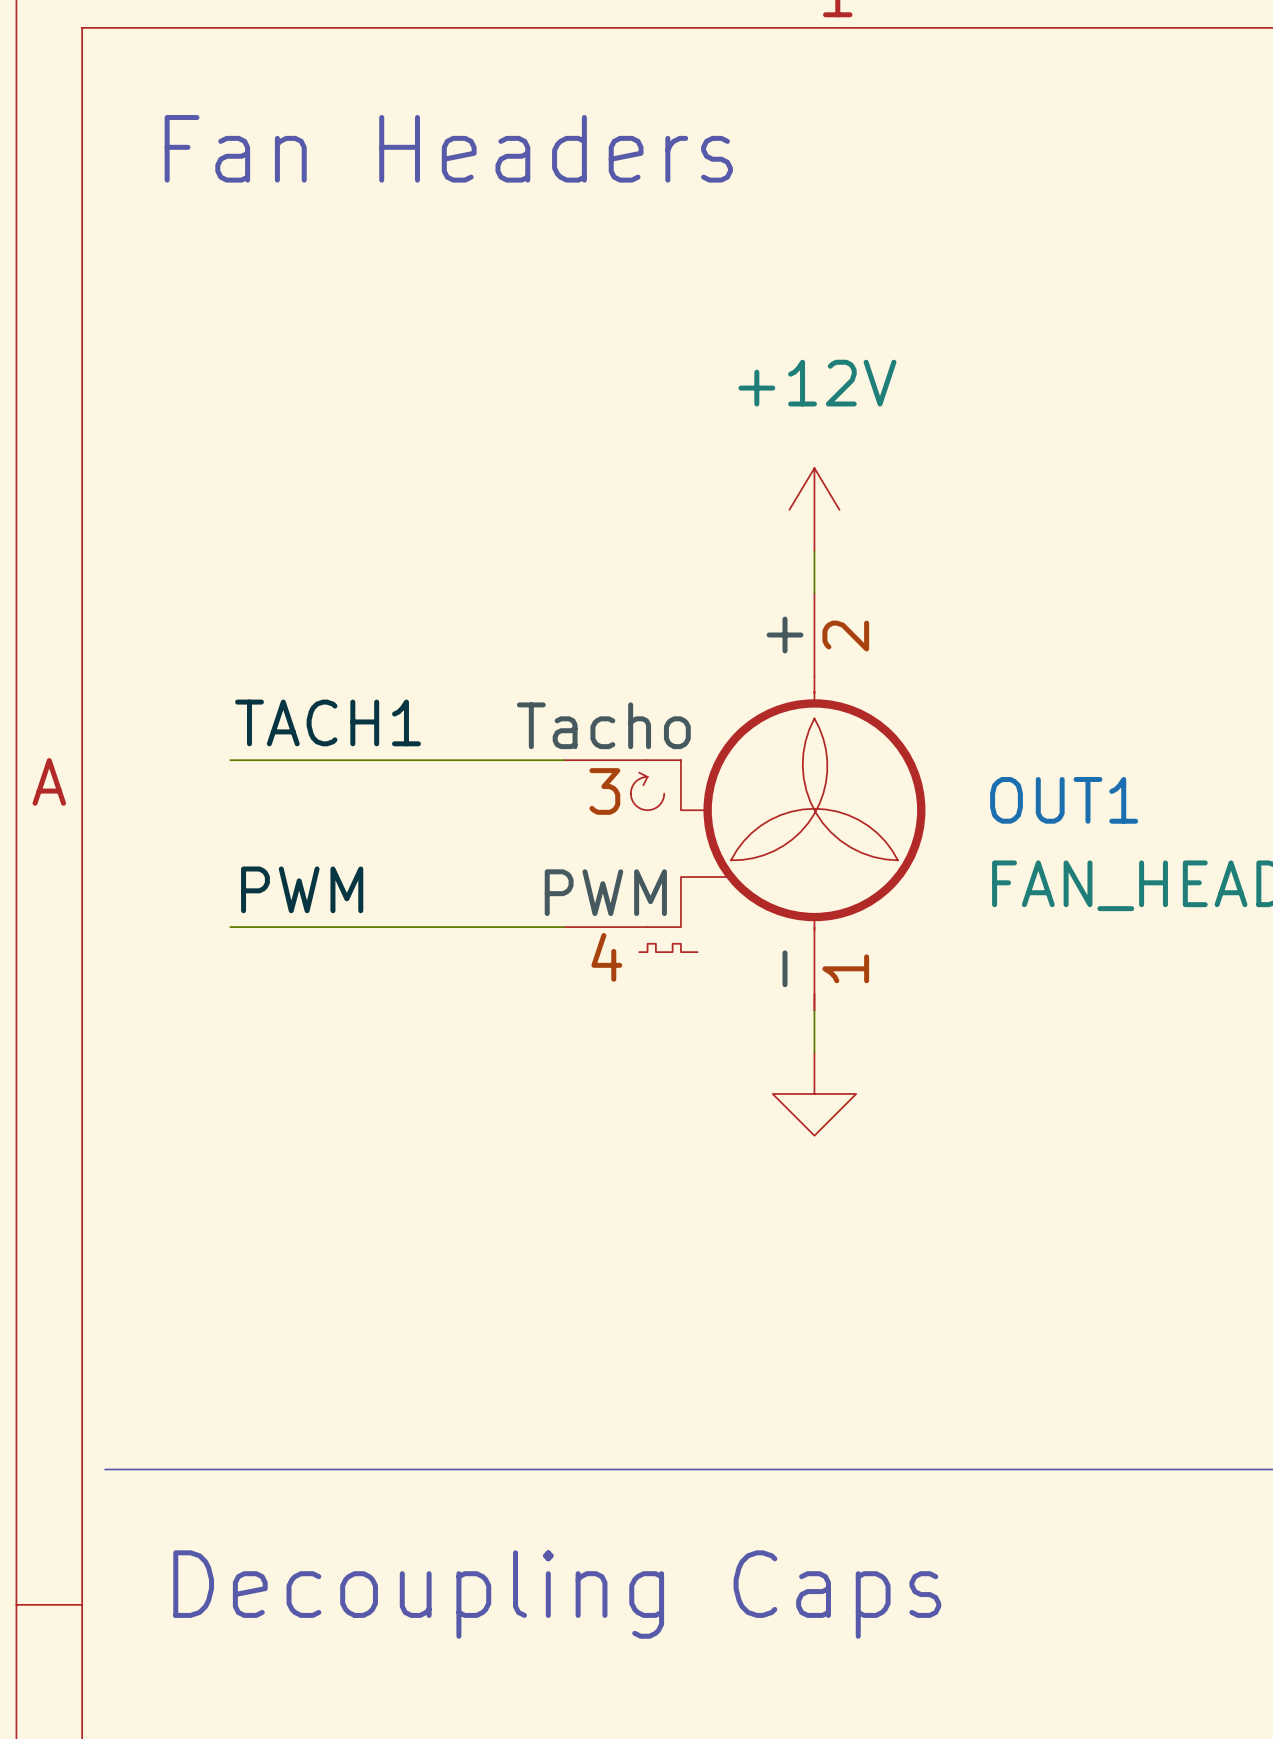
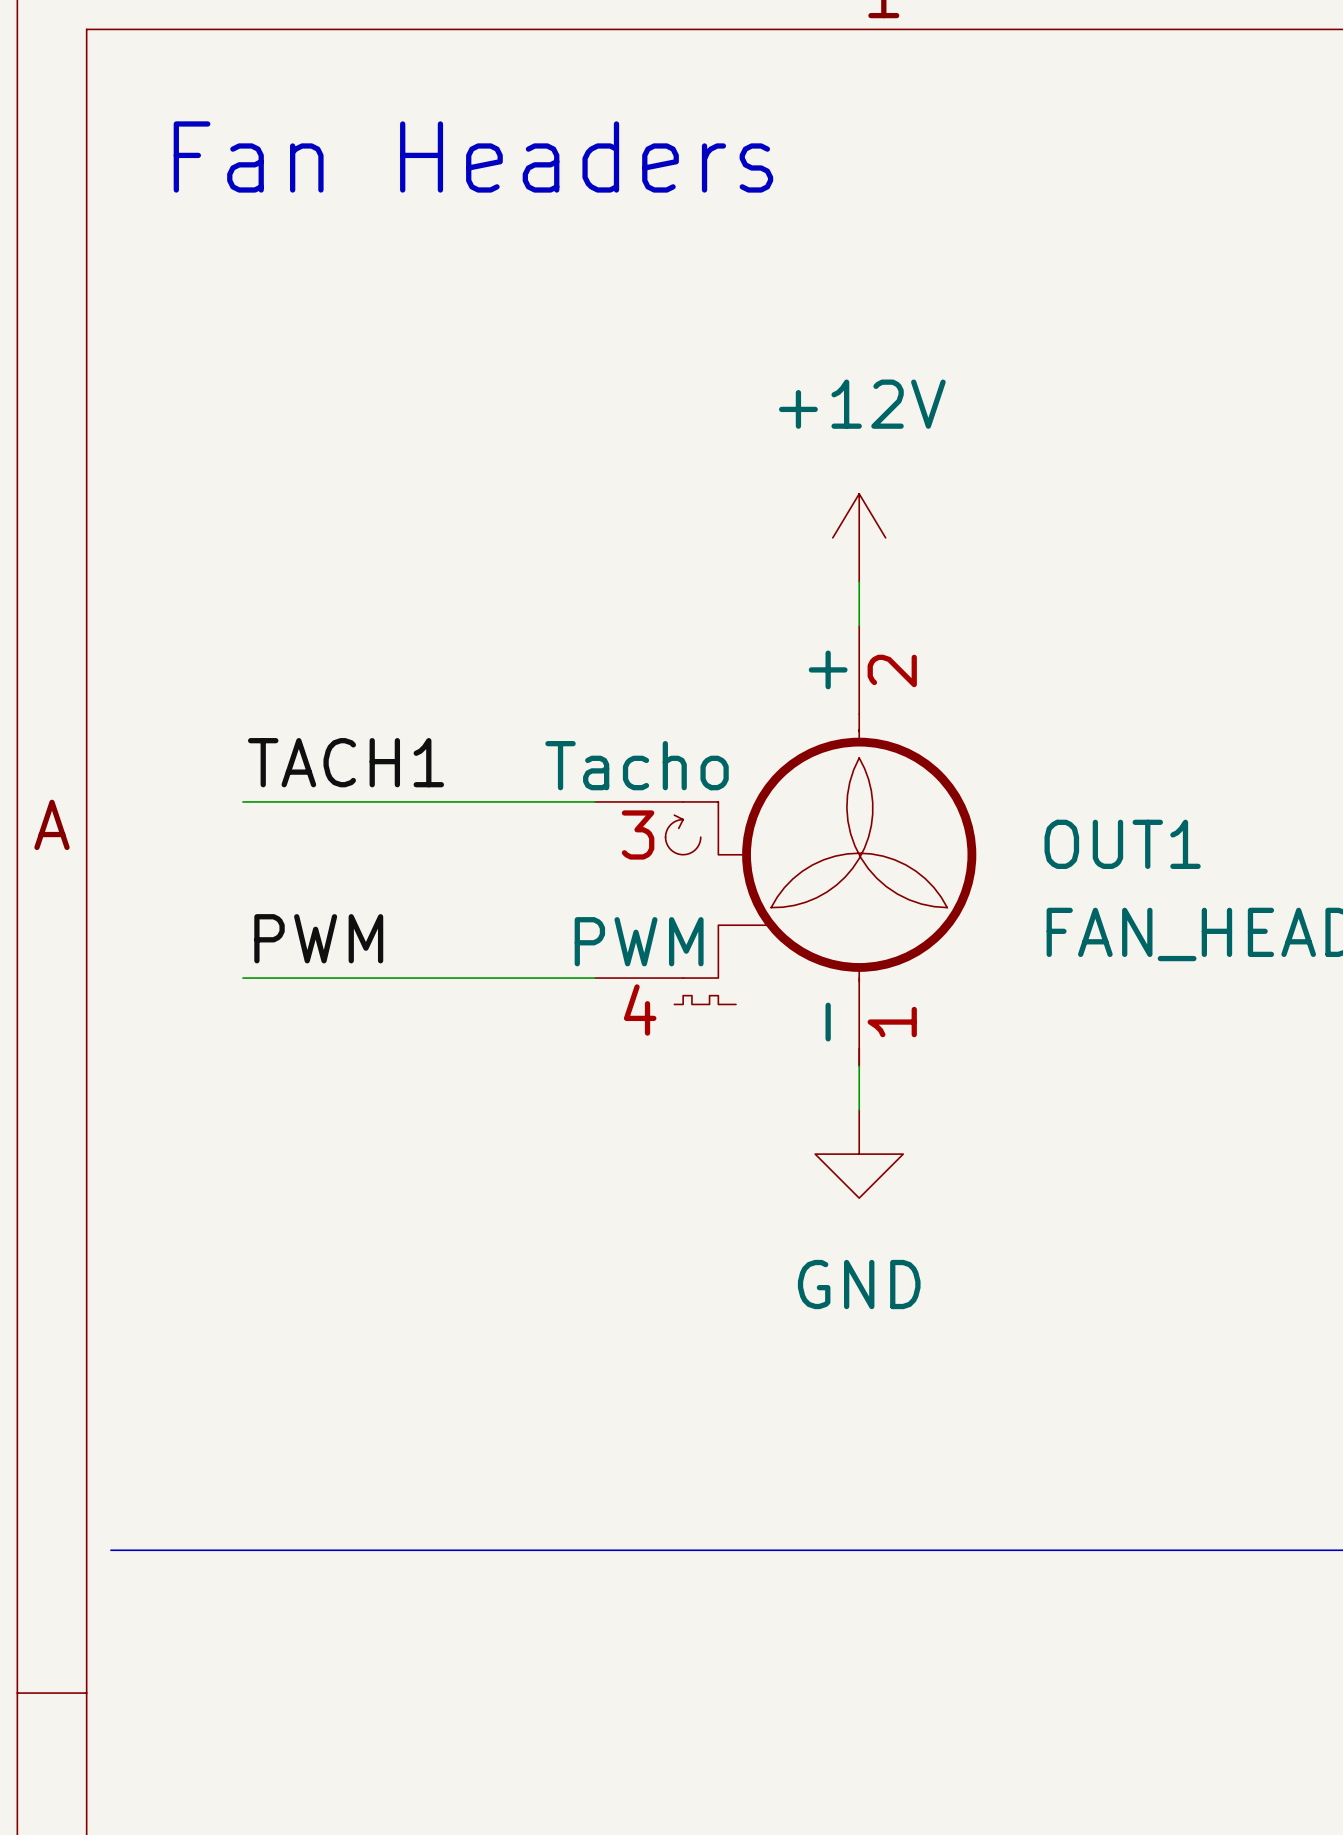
power symbol text: none -> GND (859, 1284)
text: Decoupling Caps (557, 1594) -> none

